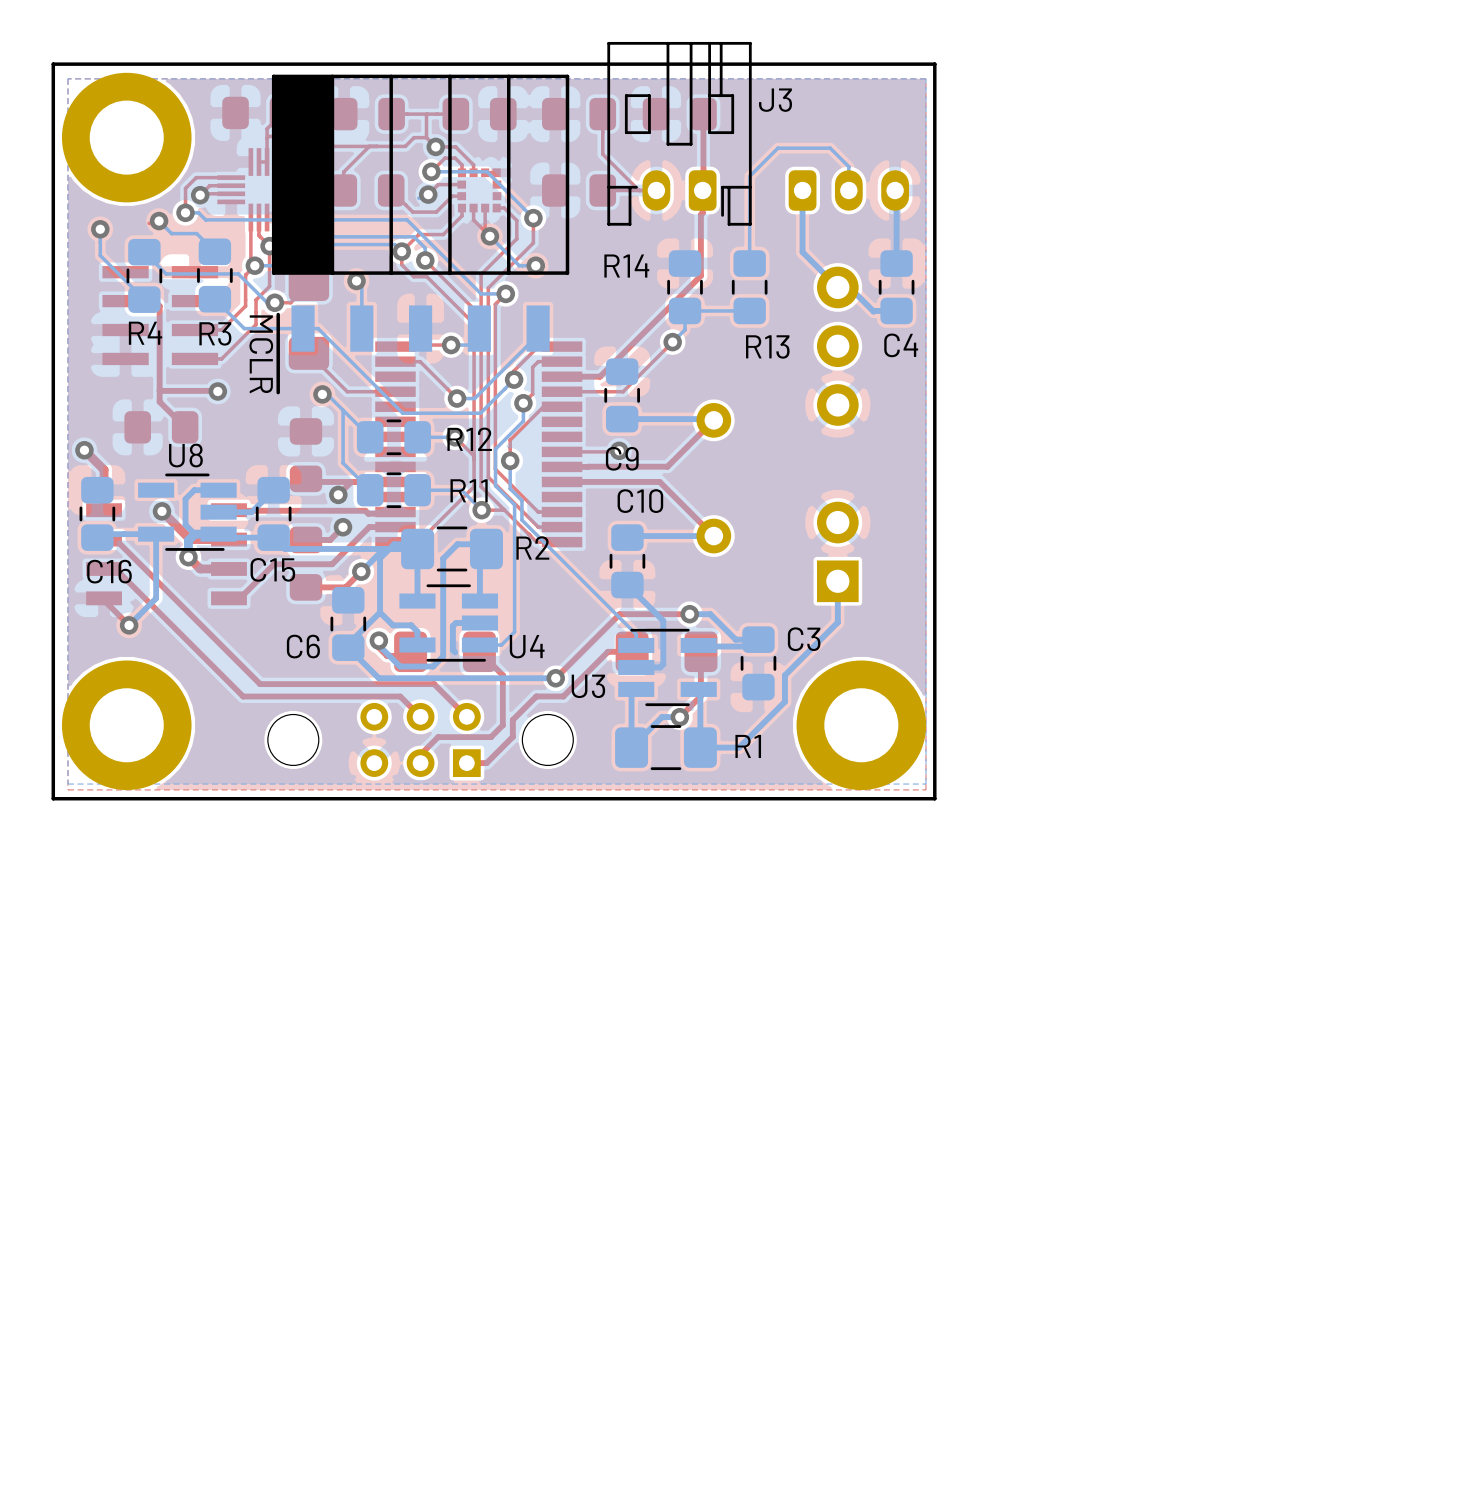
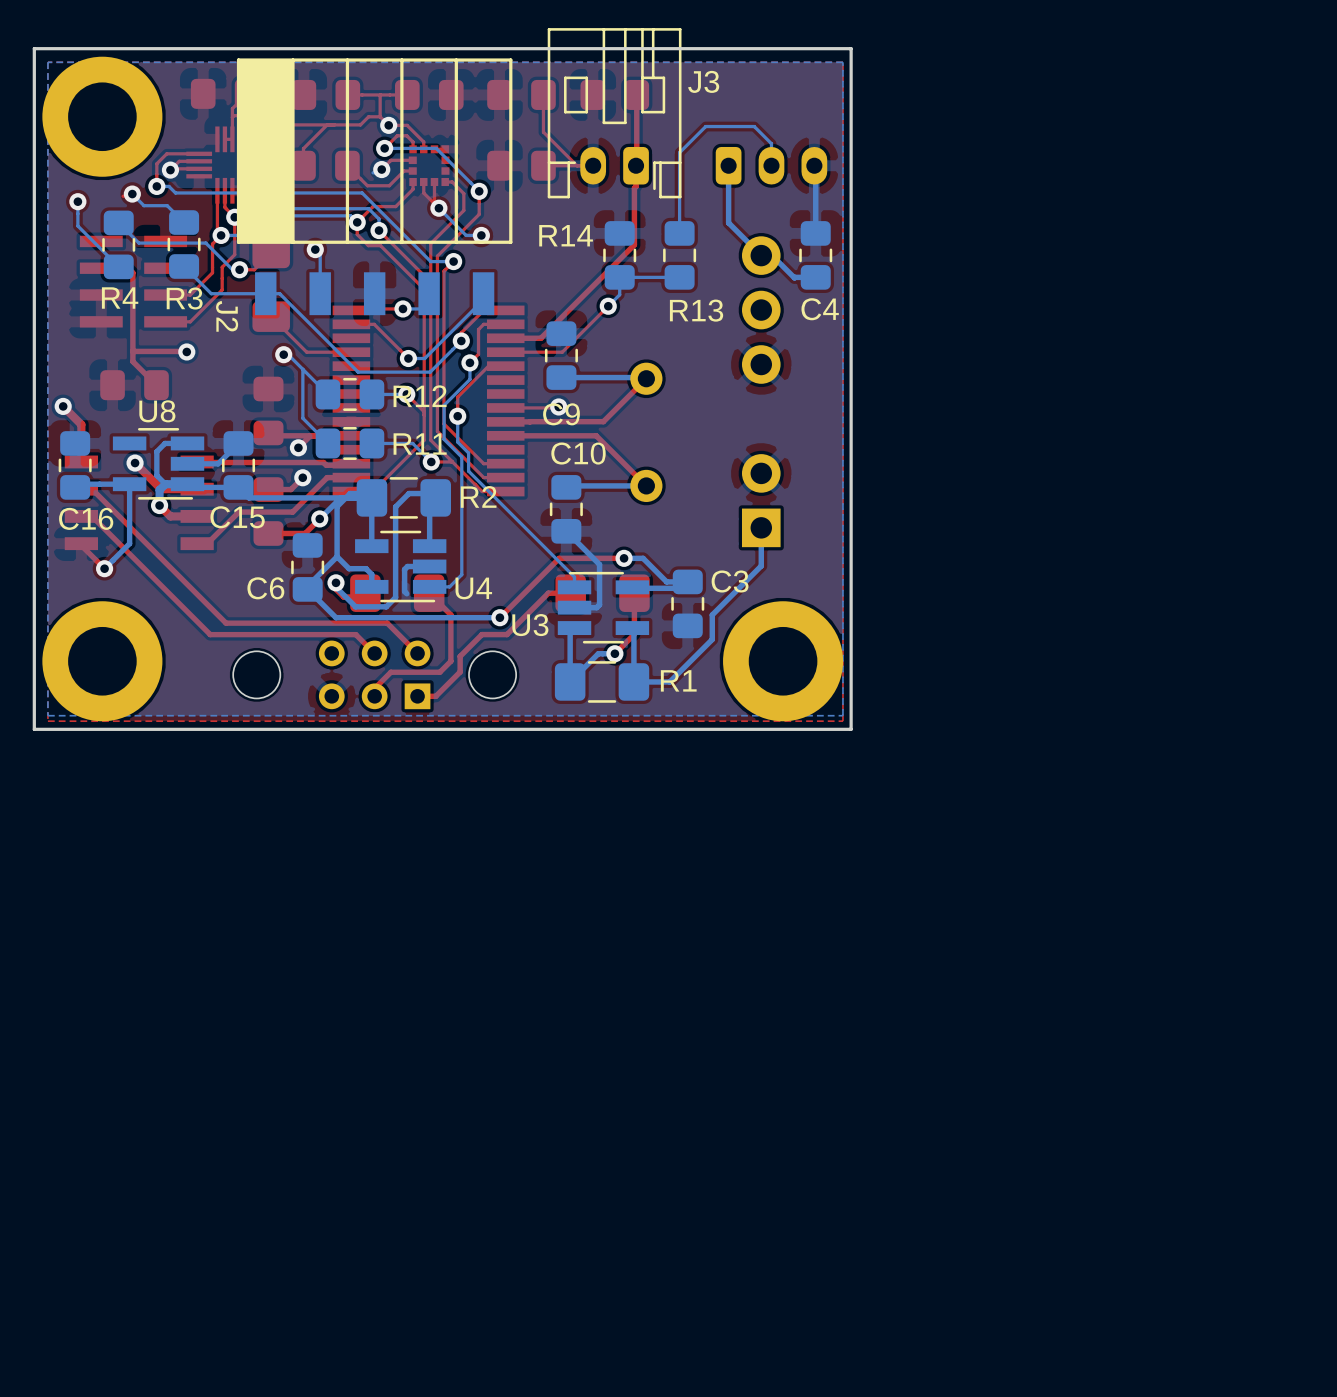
~{MCLR} name: ~{MCLR} (263, 353) -> J2 (227, 316)

